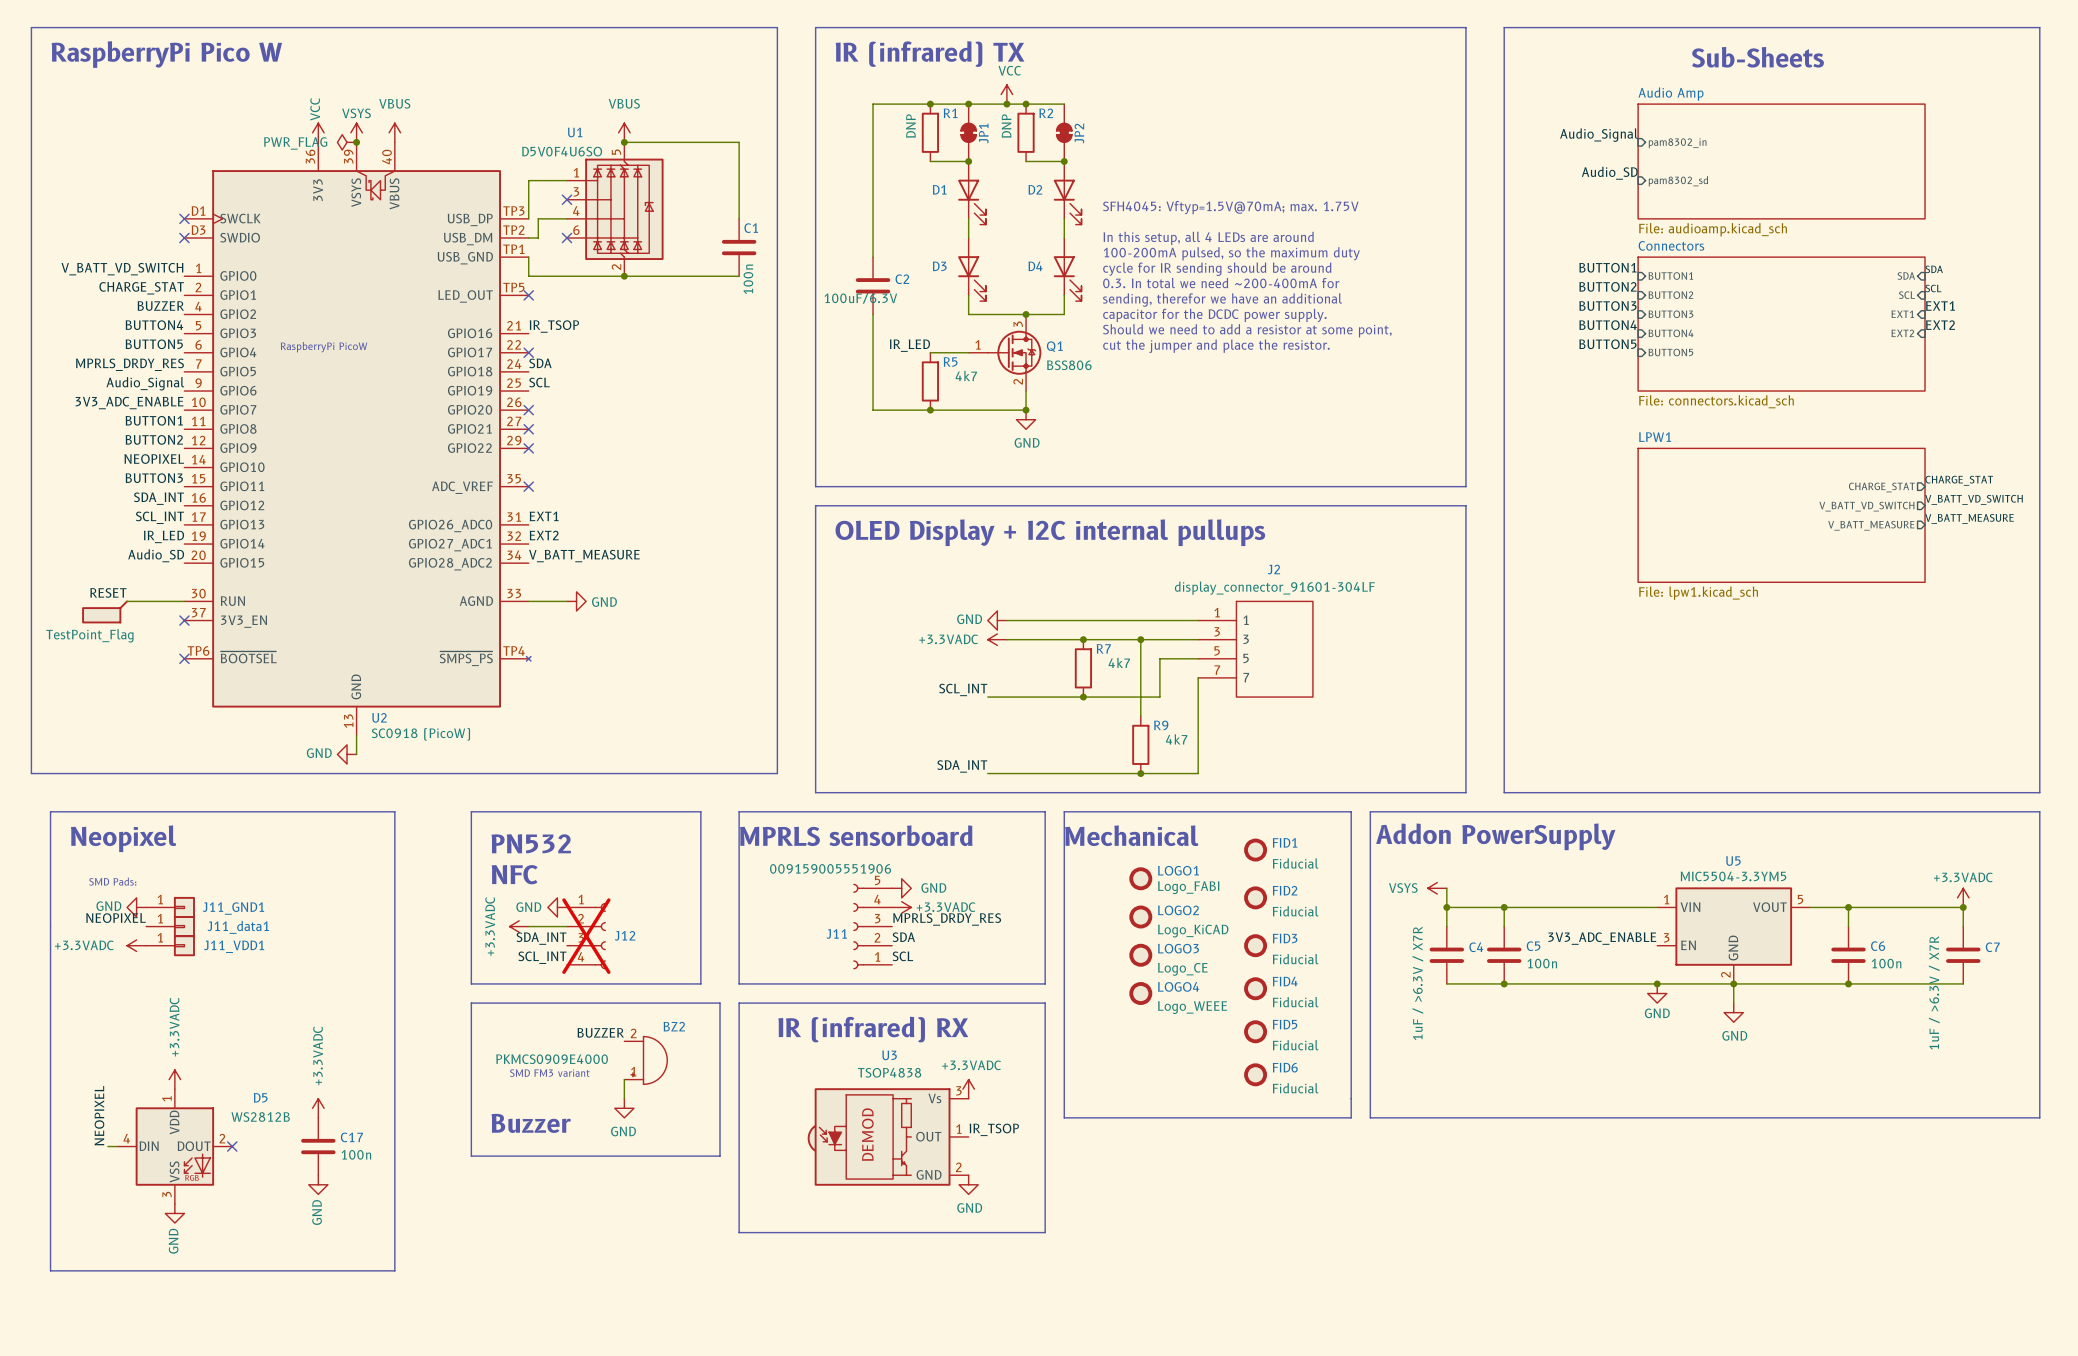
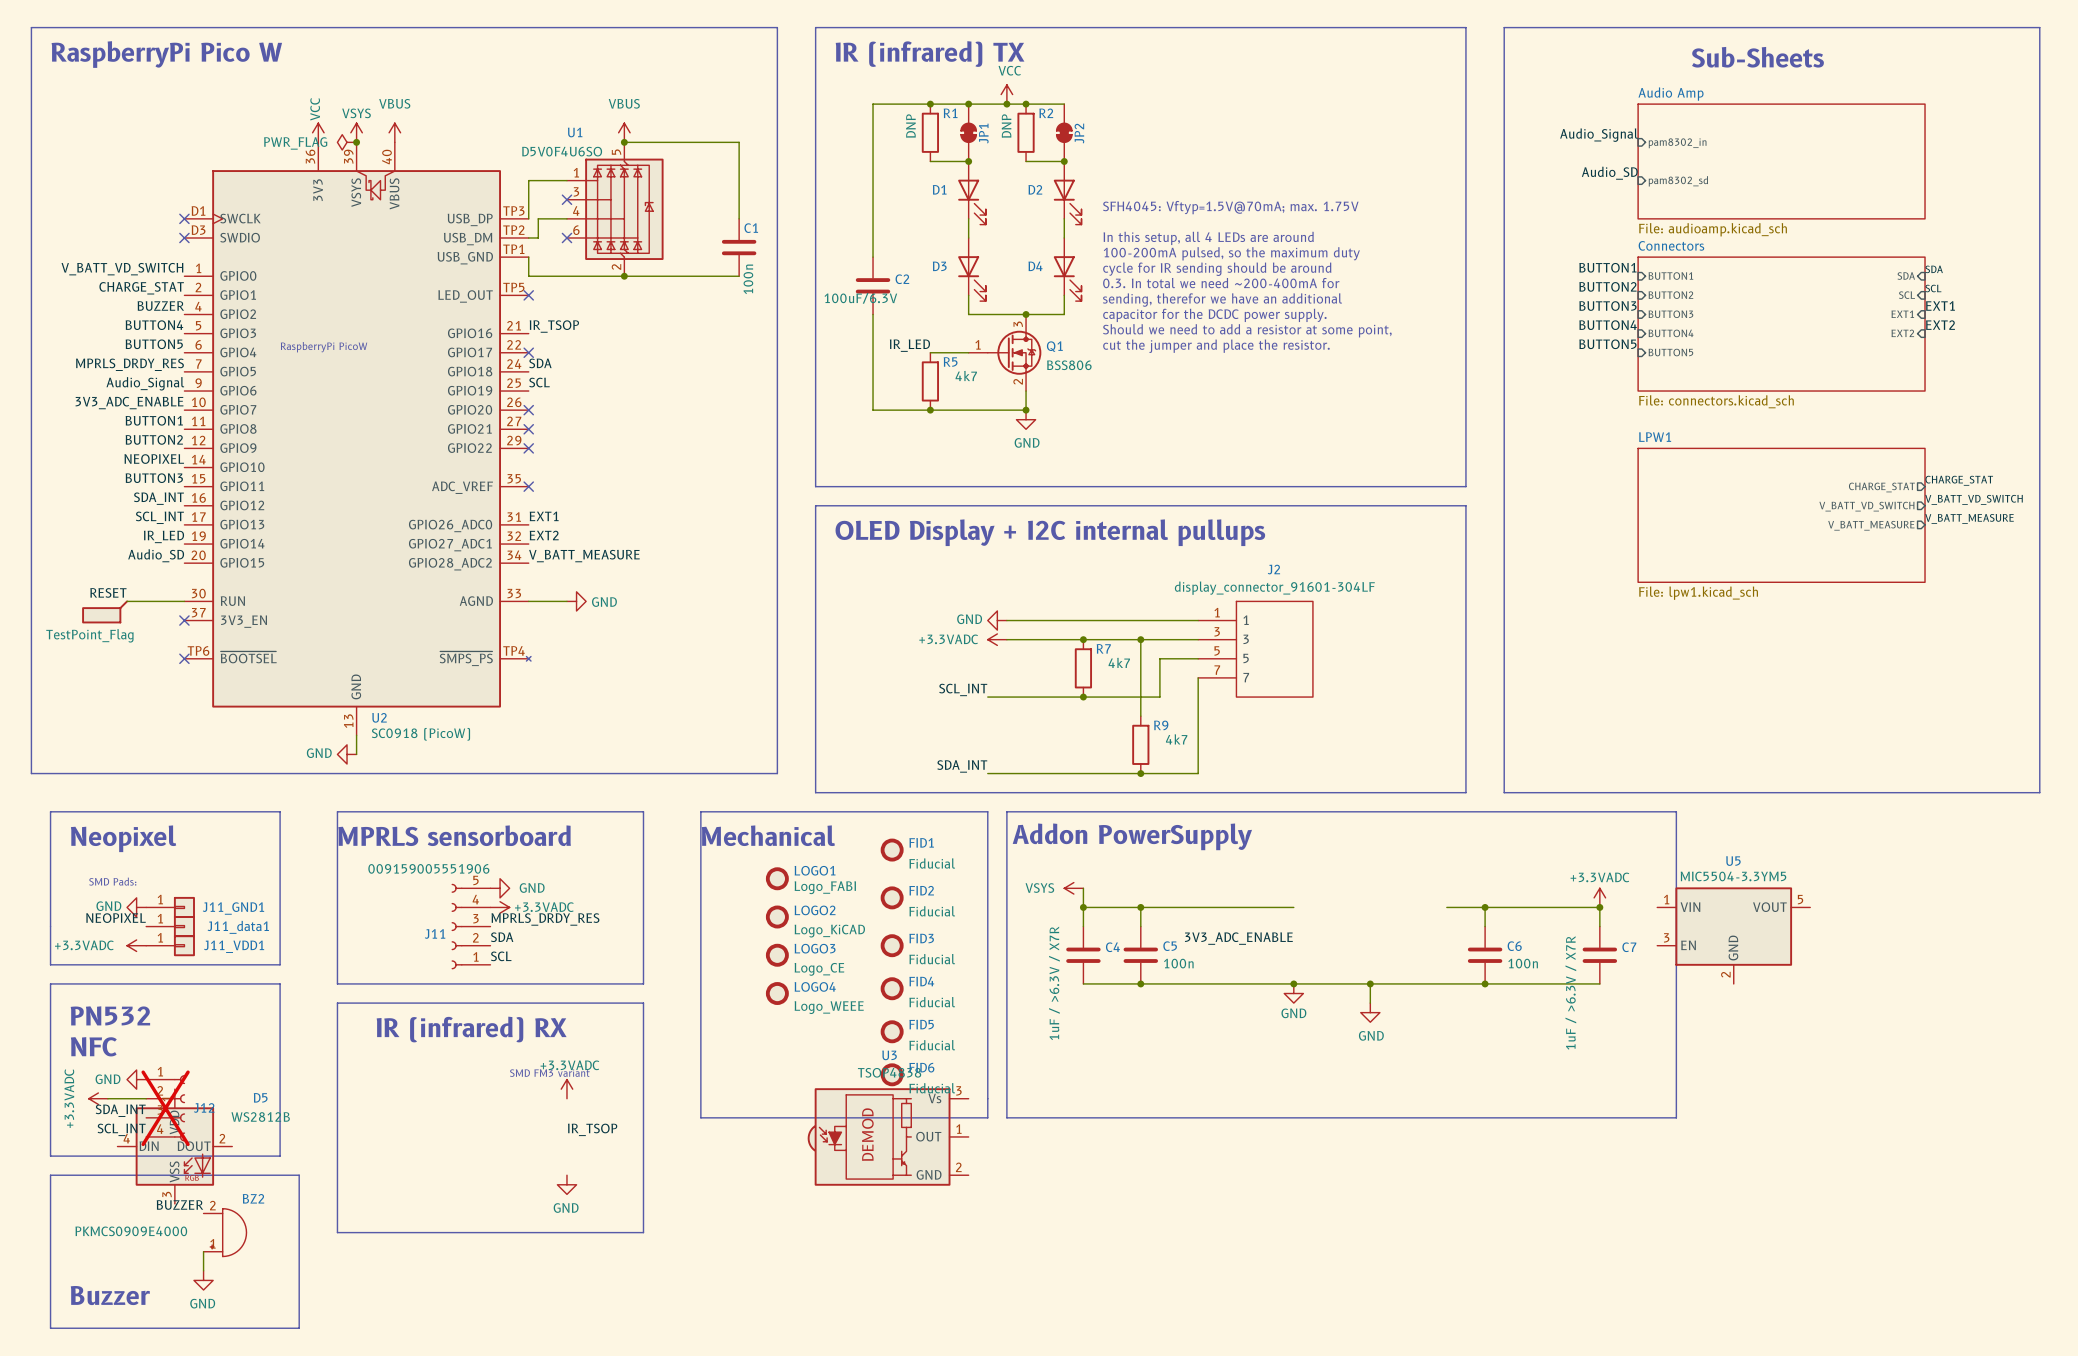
line: (280, 811) (337, 811) -> (280, 811) (280, 964) (50, 964)
line: (394, 811) (394, 1270) (50, 1270) -> (394, 811) (471, 811)
line: (471, 811) (471, 983) -> (337, 811) (337, 983) (471, 983)
line: (643, 811) (700, 811) -> (739, 811) (700, 811)
line: (739, 811) (739, 983) (1045, 983) (1045, 811) -> (1064, 811) (1045, 811)
line: (987, 811) (1006, 811) -> (987, 811) (987, 1117) (700, 1117) (700, 983)
line: (1064, 811) (1064, 1117) -> (1006, 811) (1006, 1117) (1064, 1117)
line: (1351, 811) (1351, 1117) -> (1351, 811) (1370, 811)
line: (1370, 811) (1370, 1117) -> (1351, 1117) (1370, 1117)
line: (1676, 811) (2039, 811) (2039, 1117) (1676, 1117) -> (1676, 811) (1676, 1117)
text: none -> MPRLS sensorboard (454, 835)
text: none -> Mechanical (768, 835)
text: MPRLS sensorboard (856, 835) -> none
text: Mechanical (1131, 835) -> none
text: none -> Addon PowerSupply (1132, 836)
text: Addon PowerSupply (1495, 836) -> none
text: PN532 (531, 843) -> none
FID1 position: (1255, 850) -> (892, 850)
text: NFC (514, 874) -> none
LOGO1 position: (1140, 878) -> (777, 878)
power symbol: GND (901, 888) -> none
power symbol: none -> VSYS (1073, 888)
wire: none -> (1083, 888) (1083, 926)
power symbol: VSYS (1437, 888) -> none
wire: (1446, 888) (1446, 926) -> none
FID2 position: (1255, 897) -> (892, 897)
power symbol: none -> +3.3VADC (1599, 897)
power symbol: +3.3VADC (1963, 897) -> none
power symbol rotation: 0° (557, 907) -> 180° (500, 888)
power symbol position: GND (557, 907) -> GND (500, 888)
power symbol: +3.3VADC (901, 907) -> none
wire: none -> (1083, 907) (1293, 907)
junction: none -> (1083, 907)
junction: none -> (1140, 907)
junction: (1446, 907) -> none
junction: none -> (1485, 907)
wire: (1504, 907) (1504, 926) -> (1485, 907) (1485, 926)
junction: (1504, 907) -> none
wire: (1599, 907) (1657, 907) -> (1599, 907) (1599, 926)
junction: none -> (1599, 907)
wire: (1810, 907) (1963, 907) (1963, 926) -> none
wire: (1848, 907) (1848, 926) -> none
junction: (1848, 907) -> none
junction: (1963, 907) -> none
LOGO2 position: (1140, 917) -> (777, 917)
label: none -> MPRLS_DRDY_RES (545, 919)
label: MPRLS_DRDY_RES (947, 919) -> none
power symbol text position: +3.3VADC (490, 926) -> +3.3VADC (544, 907)
power symbol rotation: 0° (519, 926) -> 180° (500, 907)
power symbol position: +3.3VADC (519, 926) -> +3.3VADC (500, 907)
wire: (528, 926) (566, 926) -> none
J11 position: (872, 926) -> (471, 926)
J12 position: (586, 936) -> (165, 1108)
label: none -> SDA (502, 937)
label: SDA (903, 937) -> none
label: SDA_INT (541, 938) -> none
label: none -> 3V3_ADC_ENABLE (1238, 938)
label: 3V3_ADC_ENABLE (1602, 938) -> none
FID3 position: (1255, 945) -> (892, 945)
LOGO3 position: (1140, 955) -> (777, 955)
C4 position: (1446, 955) -> (1083, 955)
C5 position: (1504, 955) -> (1140, 955)
C6 position: (1848, 955) -> (1485, 955)
C7 position: (1963, 955) -> (1599, 955)
label: none -> SCL (501, 956)
label: SCL (902, 956) -> none
label: SCL_INT (542, 957) -> none
line: (50, 964) (50, 983) -> (50, 1156) (280, 1156) (280, 983) (50, 983)
line: (643, 983) (700, 983) -> (643, 983) (643, 811)
wire: none -> (1083, 983) (1446, 983)
junction: none -> (1140, 983)
junction: none -> (1293, 983)
junction: none -> (1370, 983)
junction position: (1504, 983) -> (1485, 983)
wire: (1599, 983) (1963, 983) -> none
junction: (1657, 983) -> none
wire: (1733, 983) (1733, 1003) -> none
junction: (1733, 983) -> none
junction: (1848, 983) -> none
FID4 position: (1255, 988) -> (892, 988)
LOGO4 position: (1140, 993) -> (777, 993)
power symbol: none -> GND (1293, 993)
power symbol: GND (1657, 993) -> none
line: (471, 1003) (471, 1156) (720, 1156) (720, 1003) (643, 1003) -> (471, 1003) (337, 1003) (337, 1232) (643, 1232) (643, 1003)
line: (739, 1003) (1045, 1003) (1045, 1232) (739, 1232) (739, 1003) -> none
power symbol: none -> GND (1370, 1012)
power symbol: GND (1733, 1012) -> none
text: none -> PN532 (110, 1015)
text: none -> IR (infrared) RX (471, 1029)
text: IR (infrared) RX (873, 1029) -> none
FID5 position: (1255, 1031) -> (892, 1031)
label: BUZZER (600, 1032) -> none
text: none -> NFC (93, 1046)
BZ2 position: (645, 1060) -> (225, 1232)
FID6 position: (1255, 1074) -> (892, 1074)
power symbol: none -> GND (136, 1079)
power symbol rotation: 0° (174, 1079) -> 90° counterclockwise (98, 1098)
power symbol position: +3.3VADC (174, 1079) -> +3.3VADC (98, 1098)
wire: (624, 1079) (624, 1098) -> none
power symbol: none -> +3.3VADC (566, 1089)
power symbol: +3.3VADC (968, 1089) -> none
wire: none -> (107, 1098) (146, 1098)
power symbol: +3.3VADC (318, 1108) -> none
power symbol position: GND (624, 1108) -> GND (566, 1184)
label: none -> SDA_INT (120, 1110)
label: NEOPIXEL (99, 1115) -> none
text: Buzzer (531, 1123) -> none
label: none -> SCL_INT (121, 1129)
label: none -> IR_TSOP (592, 1129)
label: IR_TSOP (994, 1129) -> none
wire: (107, 1146) (117, 1146) -> none
no-connect mark: (232, 1146) -> none
C17: 100n (318, 1146) -> none
line: (50, 1156) (50, 1175) -> (50, 1270) (50, 1328) (299, 1328) (299, 1175) (50, 1175)
power symbol: GND (318, 1184) -> none
power symbol: GND (968, 1184) -> none
label: none -> BUZZER (179, 1205)
power symbol: GND (174, 1213) -> none
wire: none -> (203, 1251) (203, 1270)
power symbol: none -> GND (203, 1280)
text: none -> Buzzer (110, 1295)

